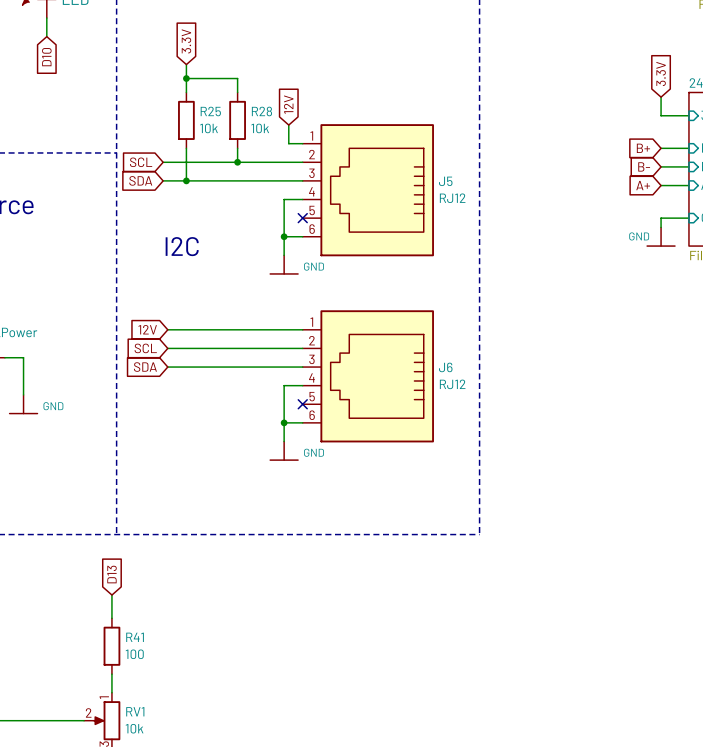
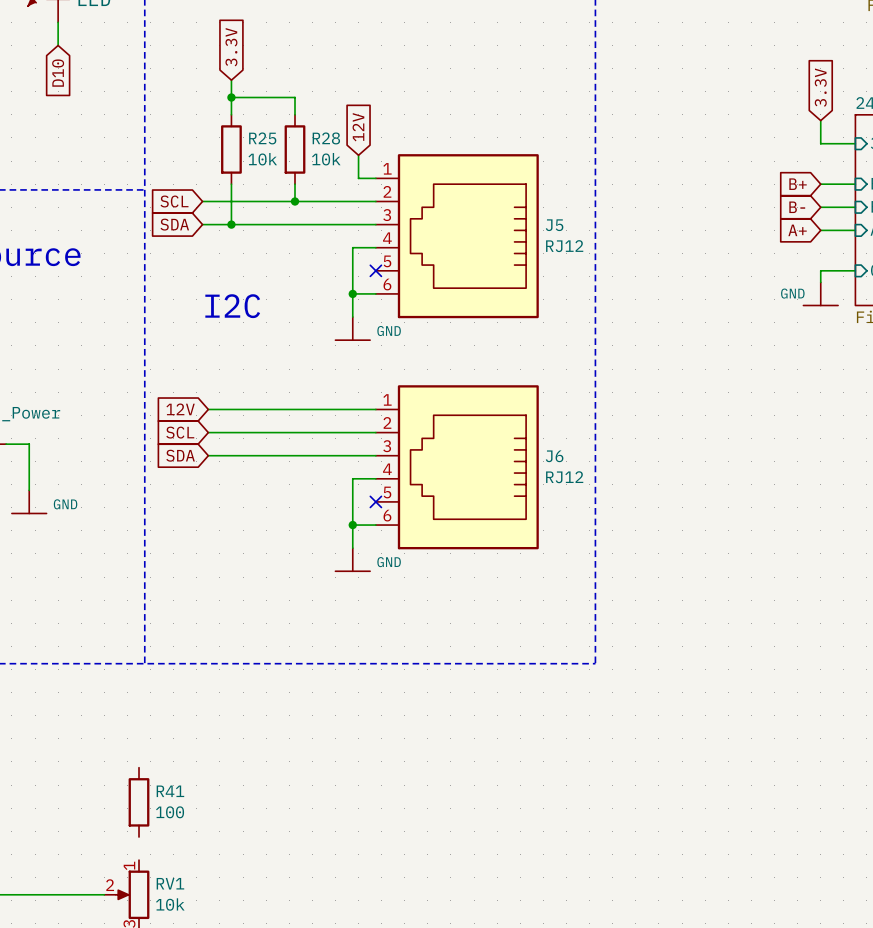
global label: D13 (112, 574) -> none
wire: (111, 595) (111, 618) -> none
wire: (111, 674) (111, 692) -> none

